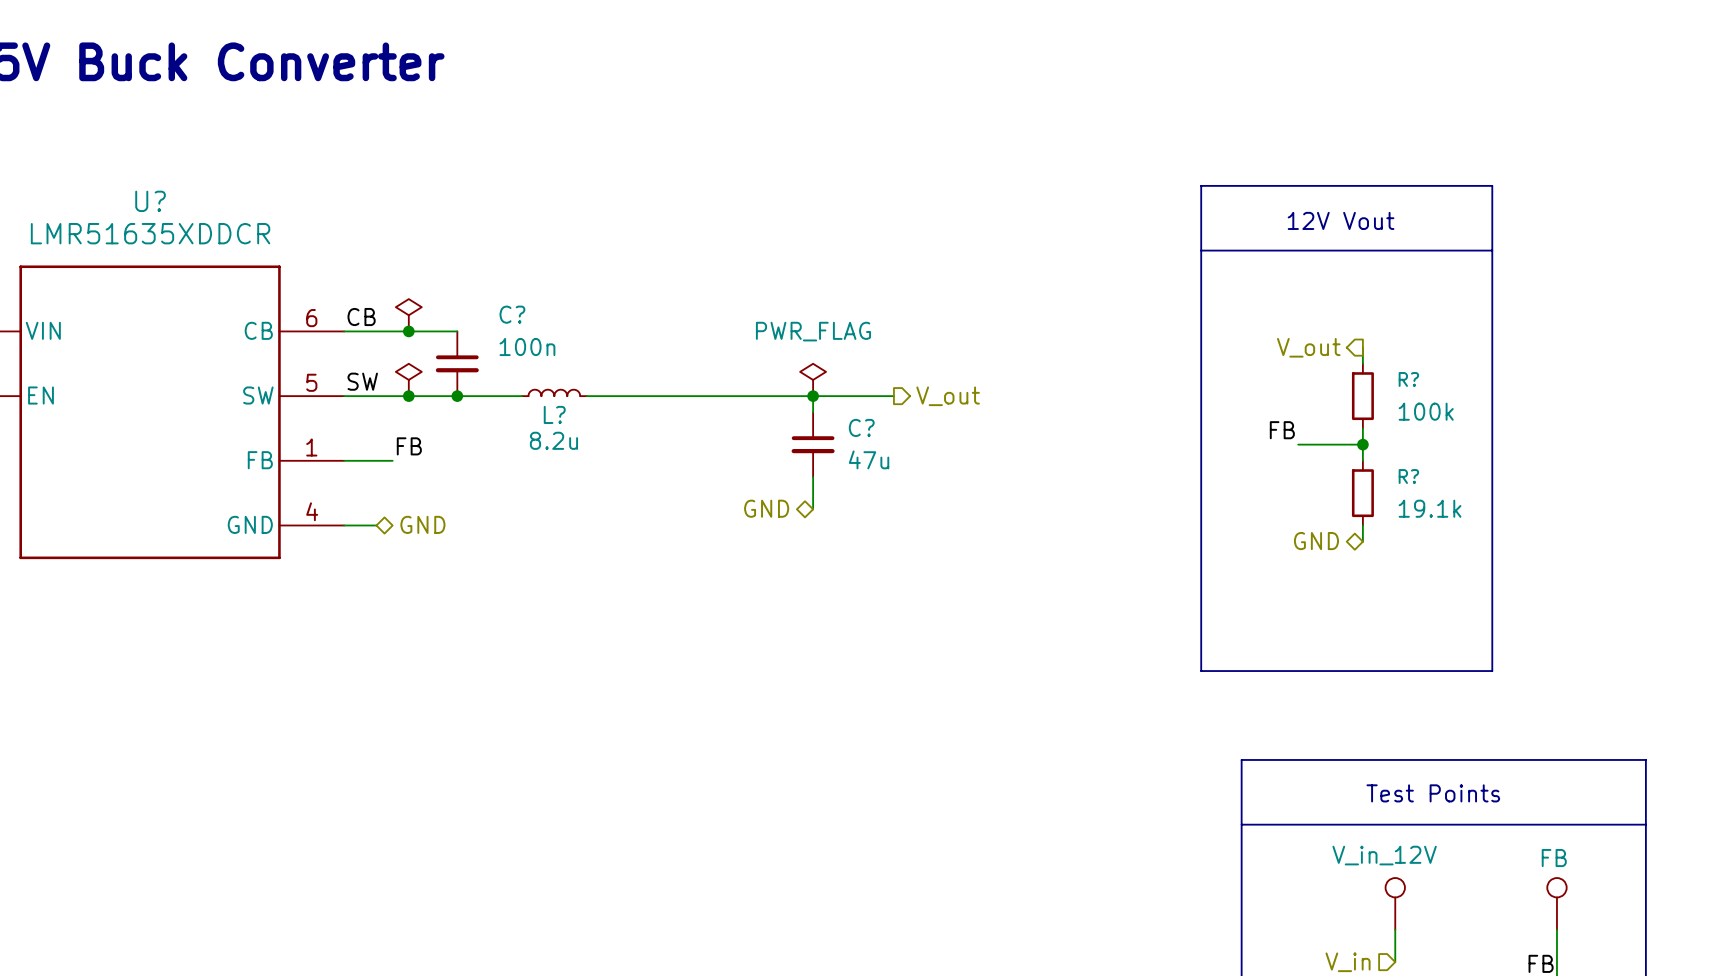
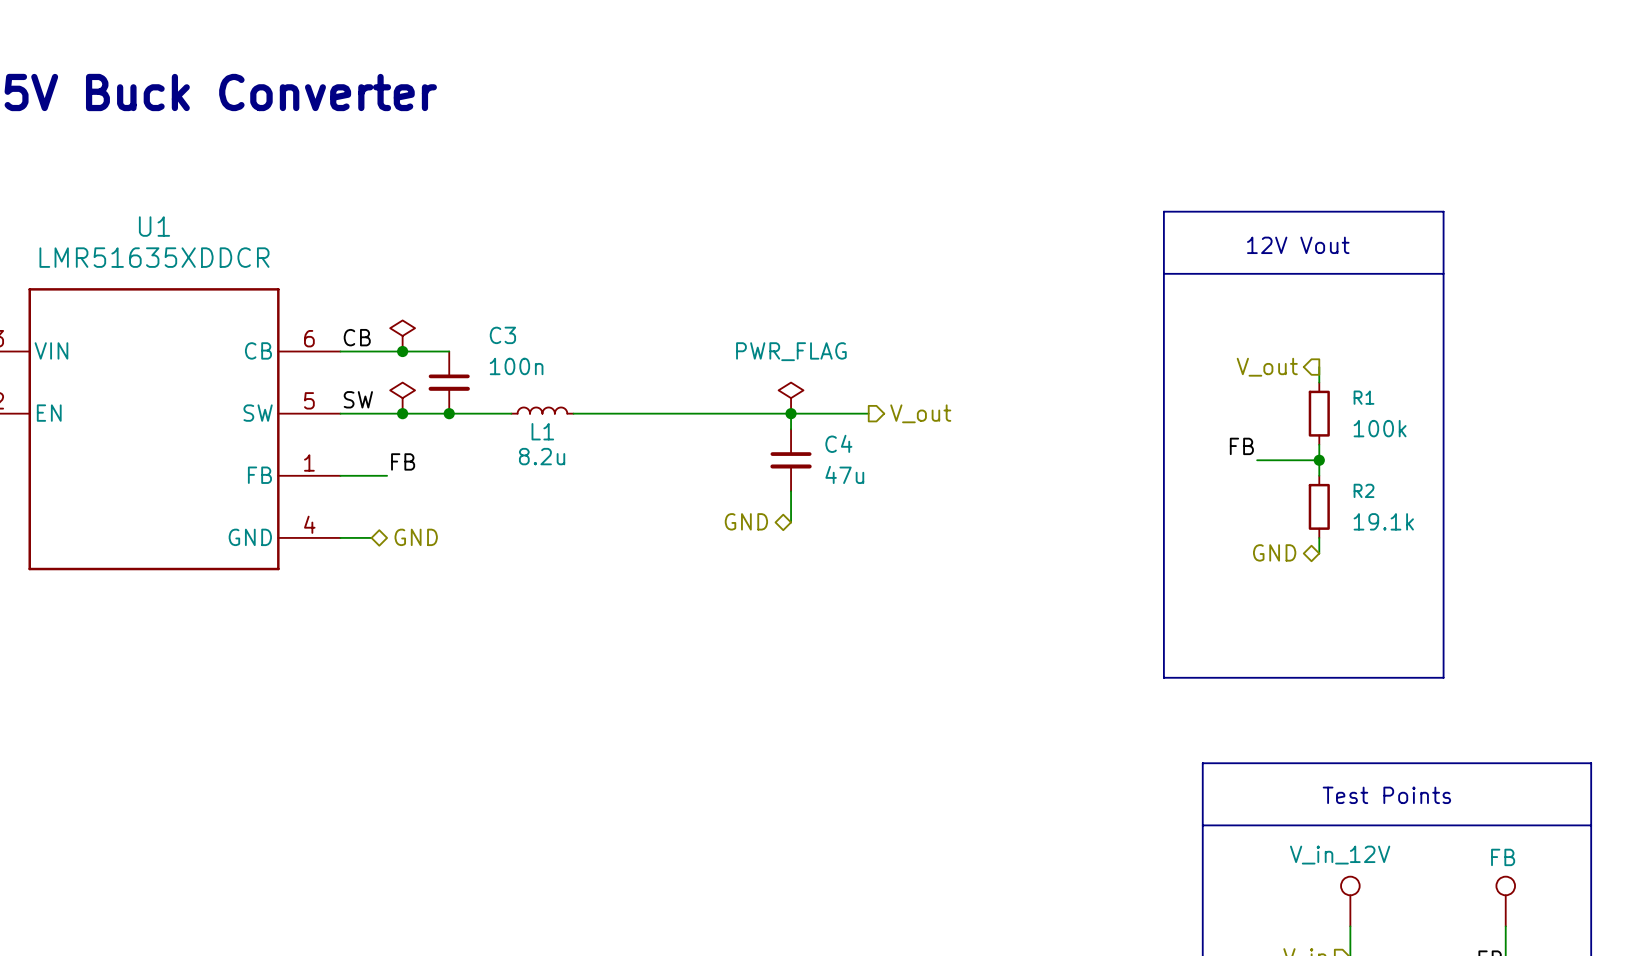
U? name: U? (150, 201) -> U1 (154, 226)
C? name: C? (512, 314) -> C3 (502, 335)
R? name: R? (1408, 379) -> R1 (1364, 397)
L? name: L? (554, 414) -> L1 (542, 431)
C? name: C? (861, 427) -> C4 (838, 443)
R? name: R? (1408, 476) -> R2 (1364, 490)

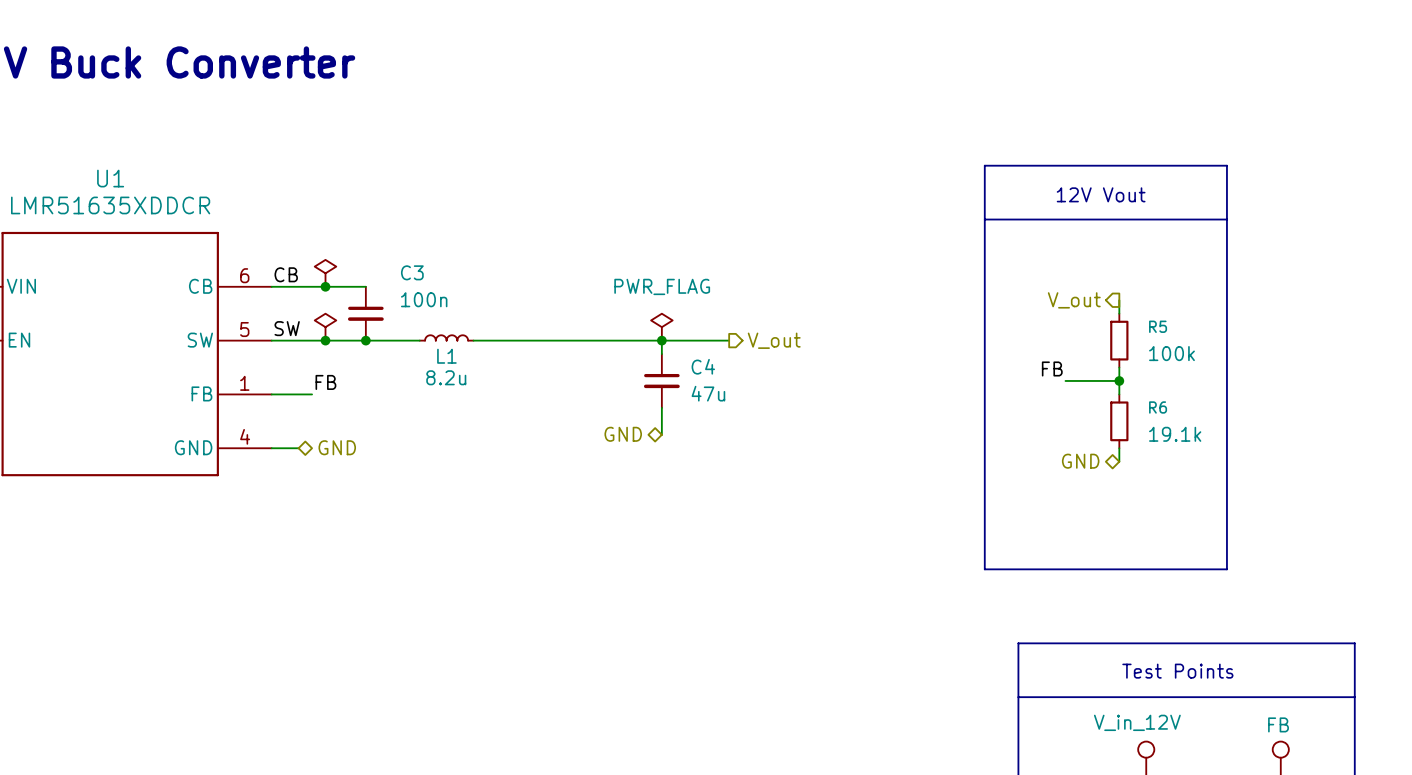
R1 name: R1 (1364, 397) -> R5 (1158, 326)
R2 name: R2 (1364, 490) -> R6 (1158, 407)

